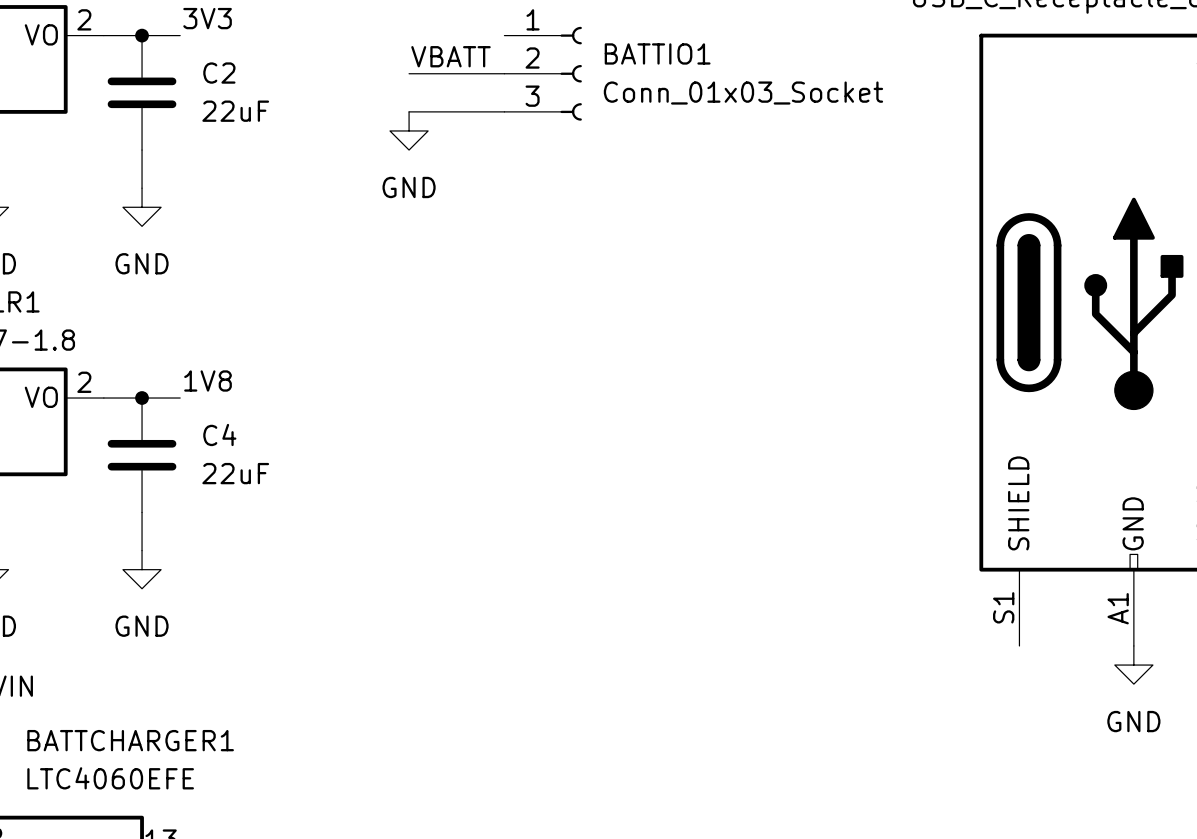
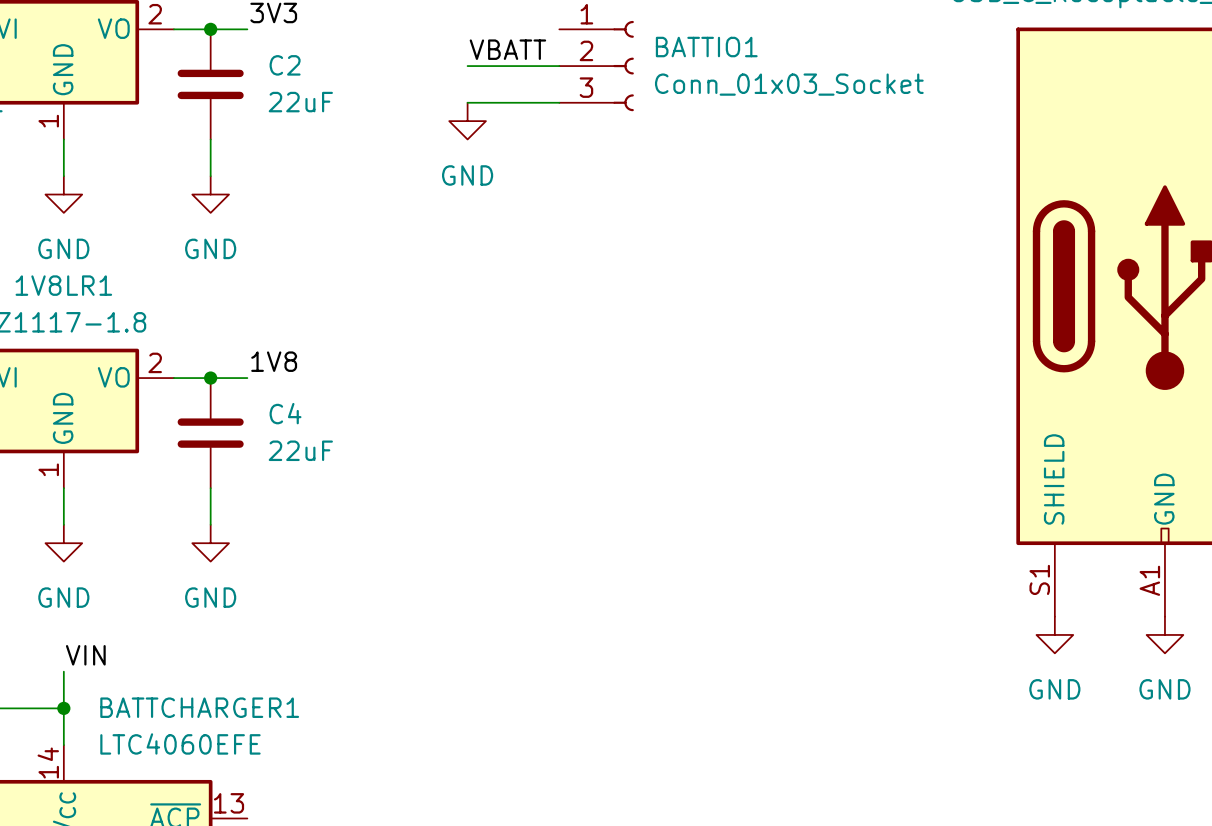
power symbol: none -> GND (1054, 634)

